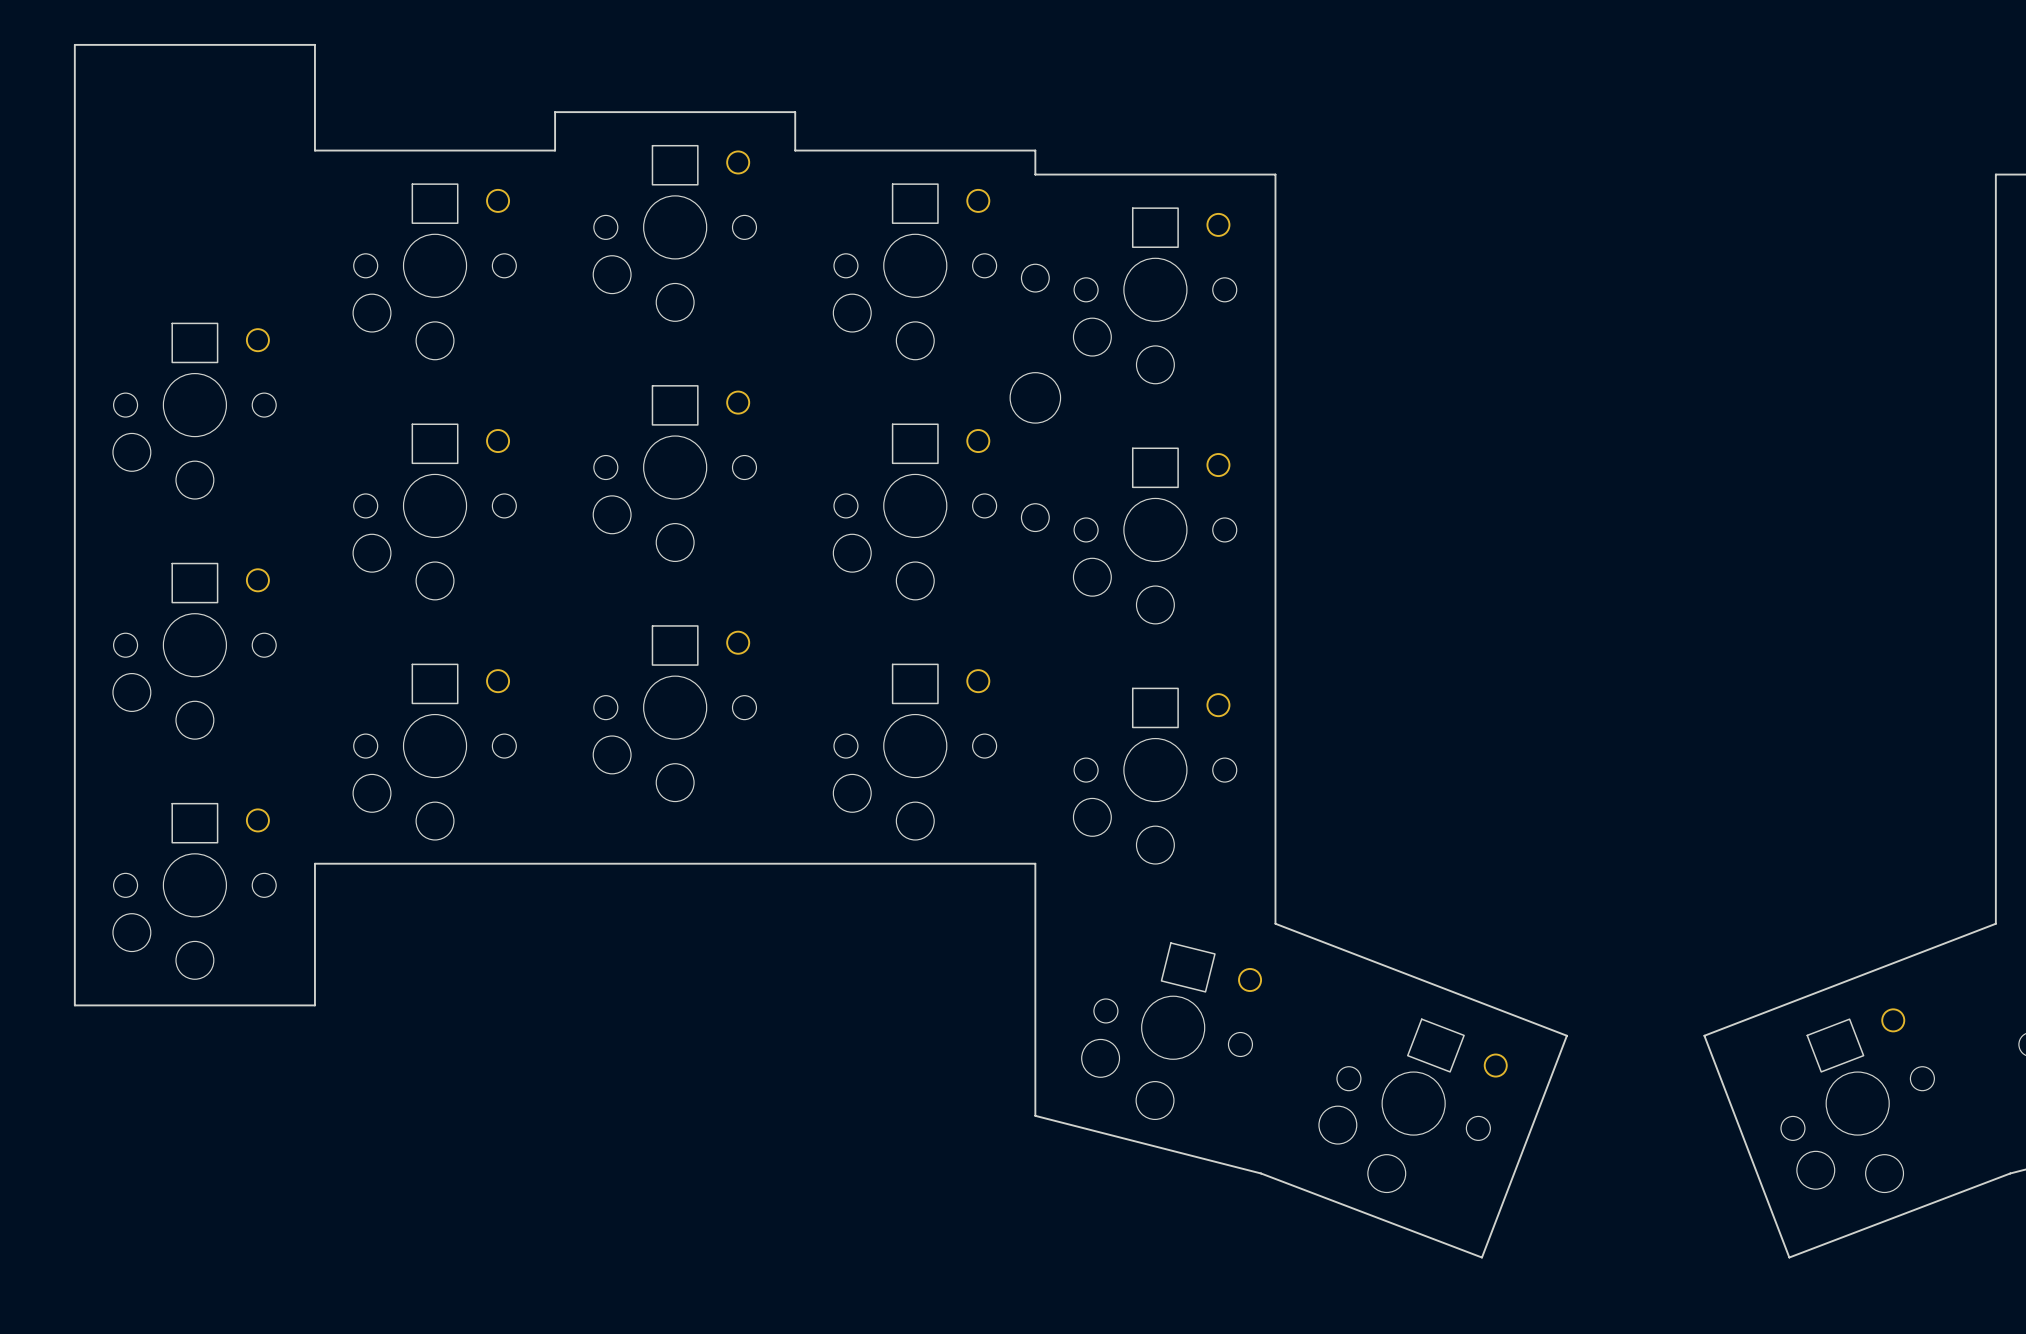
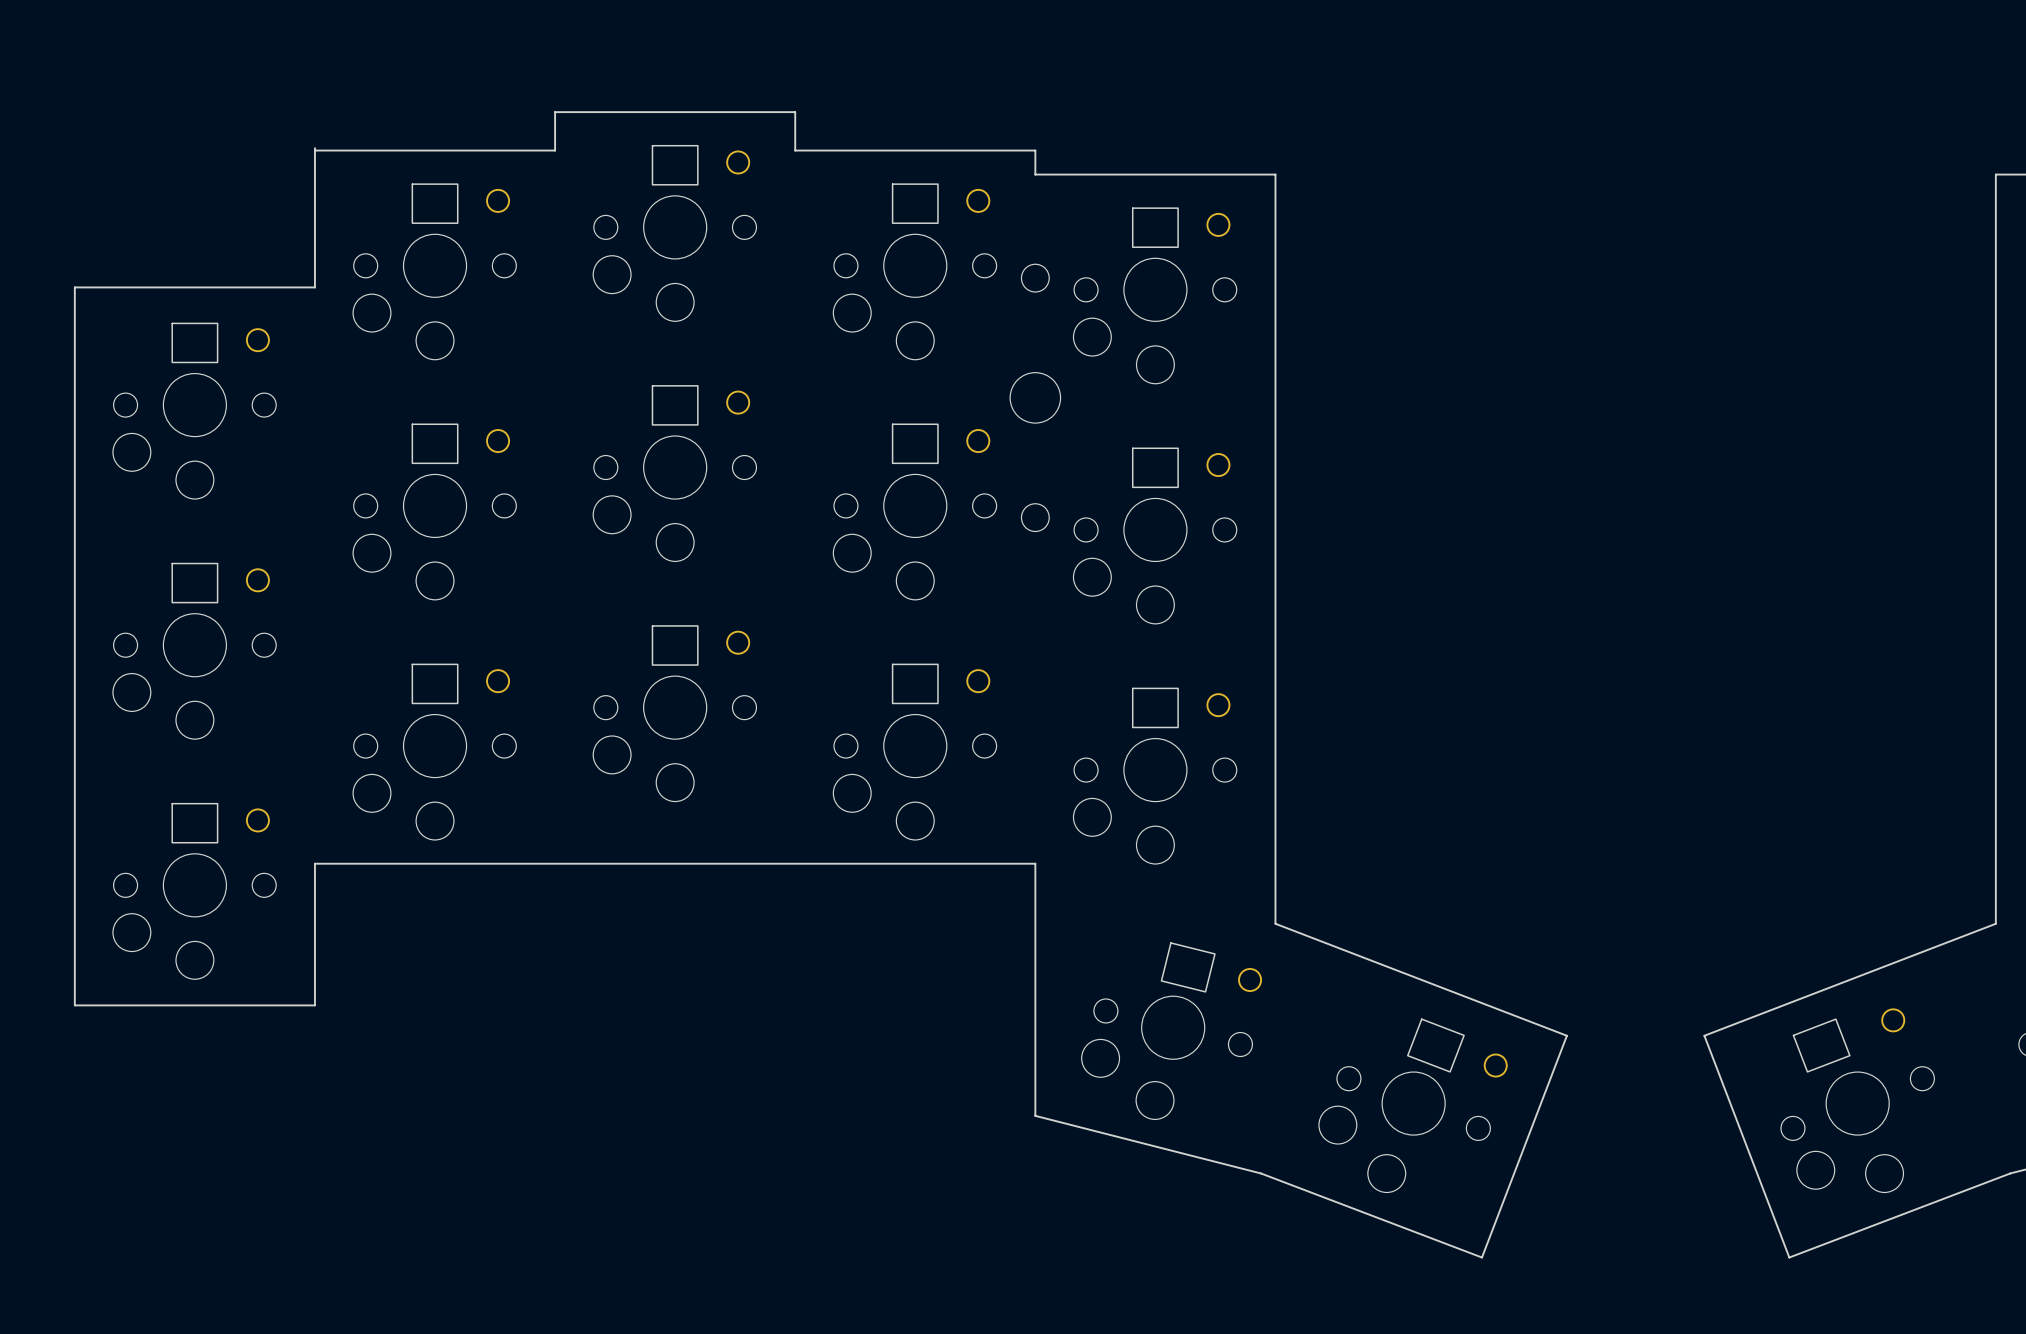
board edge: (314, 148) (314, 44) (74, 44) (74, 287) -> (314, 150) (314, 287) (74, 287)
part position: (1835, 1045) -> (1821, 1045)

